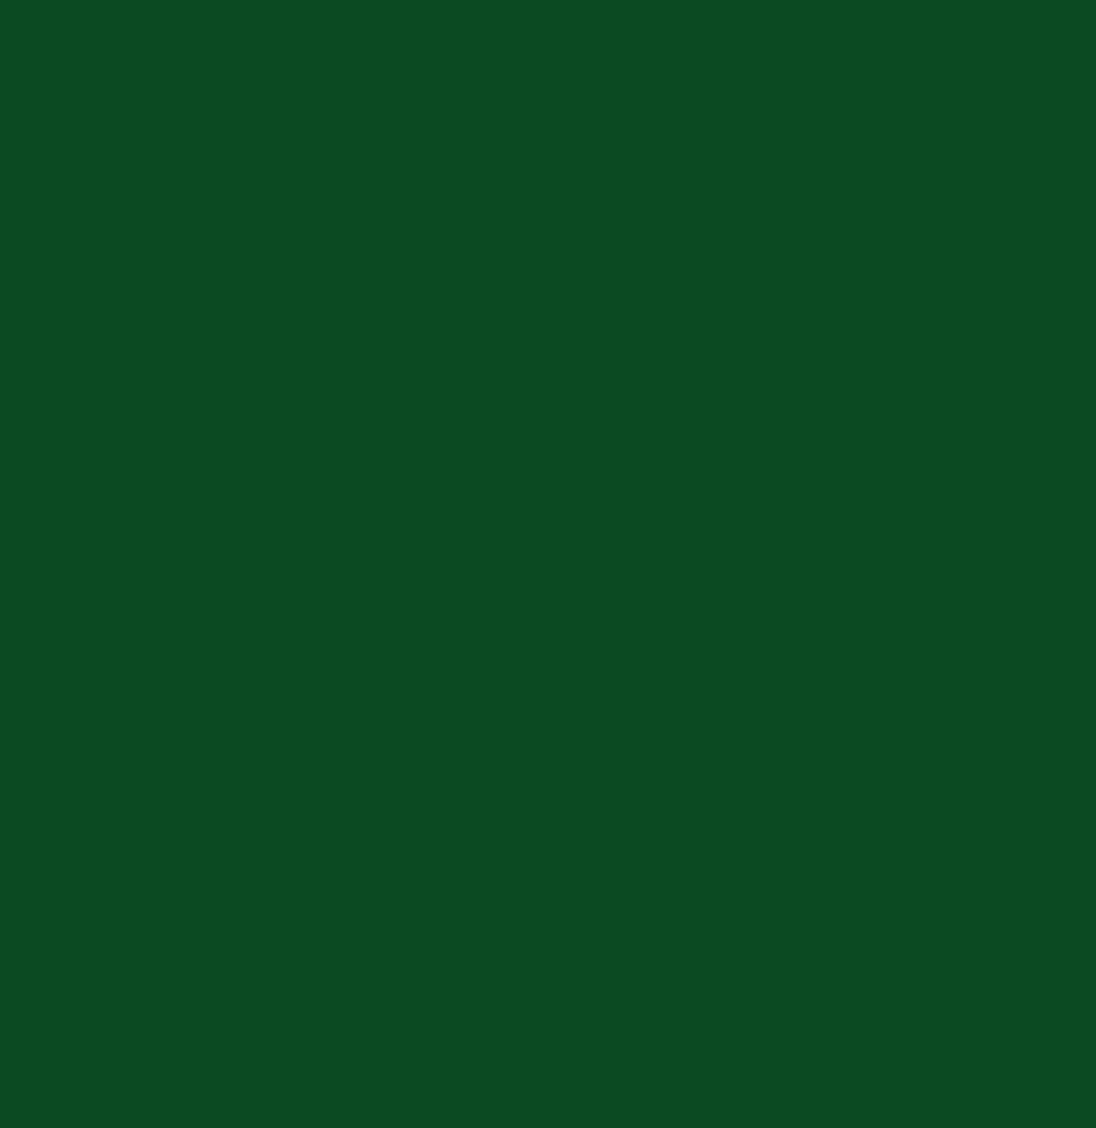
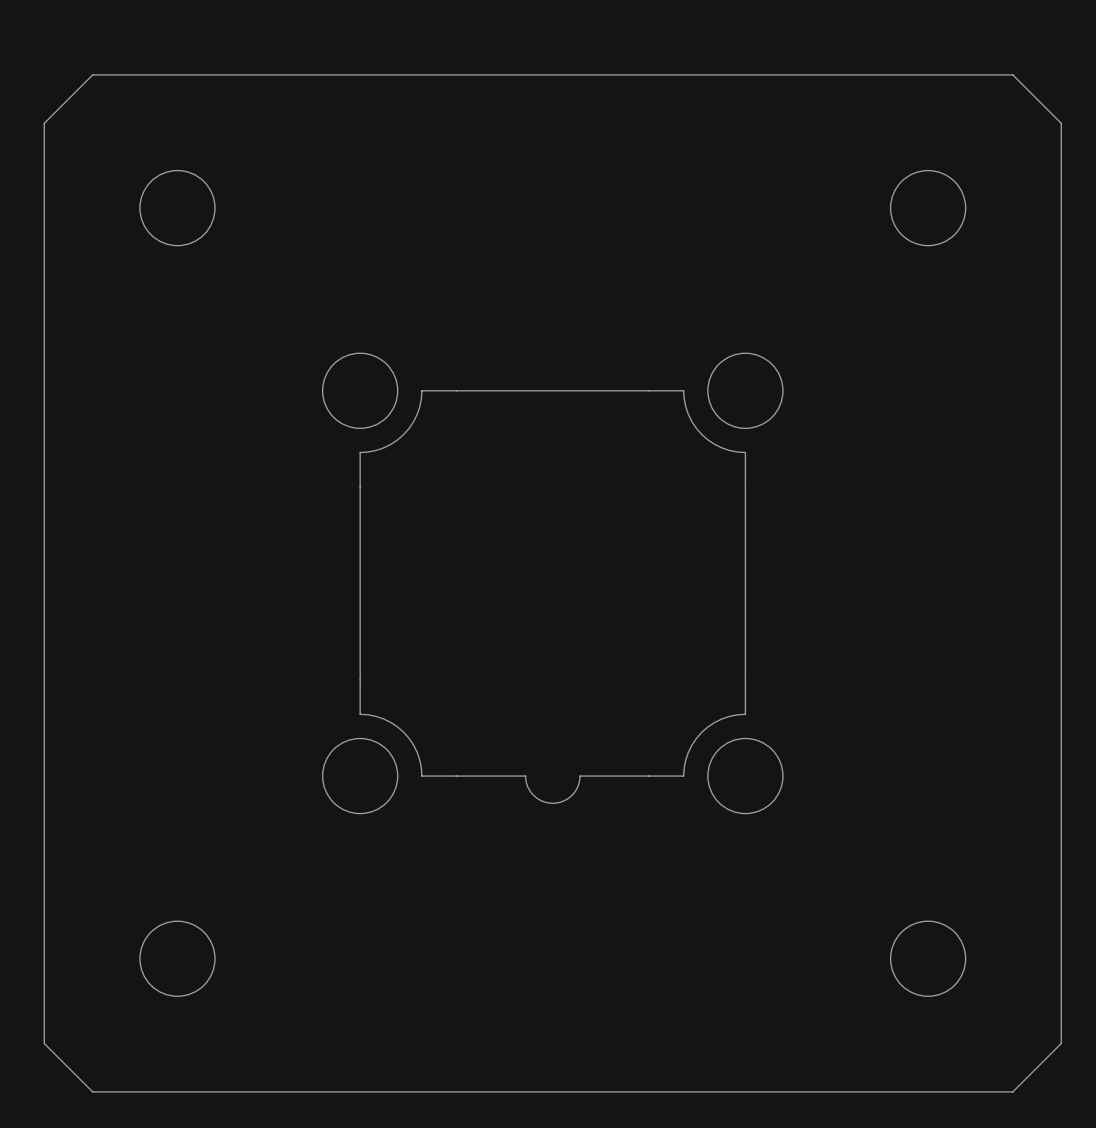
board edge: none -> (92, 74) (1012, 74) (1061, 123) (1061, 1043) (1012, 1091) (92, 1091) (44, 1043) (44, 123) (92, 74)
round board edge: none -> [139, 169, 216, 247]
round board edge: none -> [889, 169, 967, 247]
round board edge: none -> [322, 352, 399, 429]
round board edge: none -> [707, 352, 784, 429]
board edge: none -> (421, 390) (683, 390) (688, 414) (701, 434) (721, 447) (745, 452) (745, 714) (721, 719) (701, 732) (688, 752) (683, 776) (580, 776) (577, 786) (572, 795) (563, 801) (549, 803) (533, 795) (527, 786) (525, 776) (421, 776) (417, 752) (403, 732) (383, 719) (360, 714) (360, 452) (383, 447) (403, 434) (417, 414) (421, 390)
round board edge: none -> [322, 737, 399, 815]
round board edge: none -> [707, 737, 784, 815]
round board edge: none -> [139, 920, 216, 997]
round board edge: none -> [889, 920, 967, 997]

